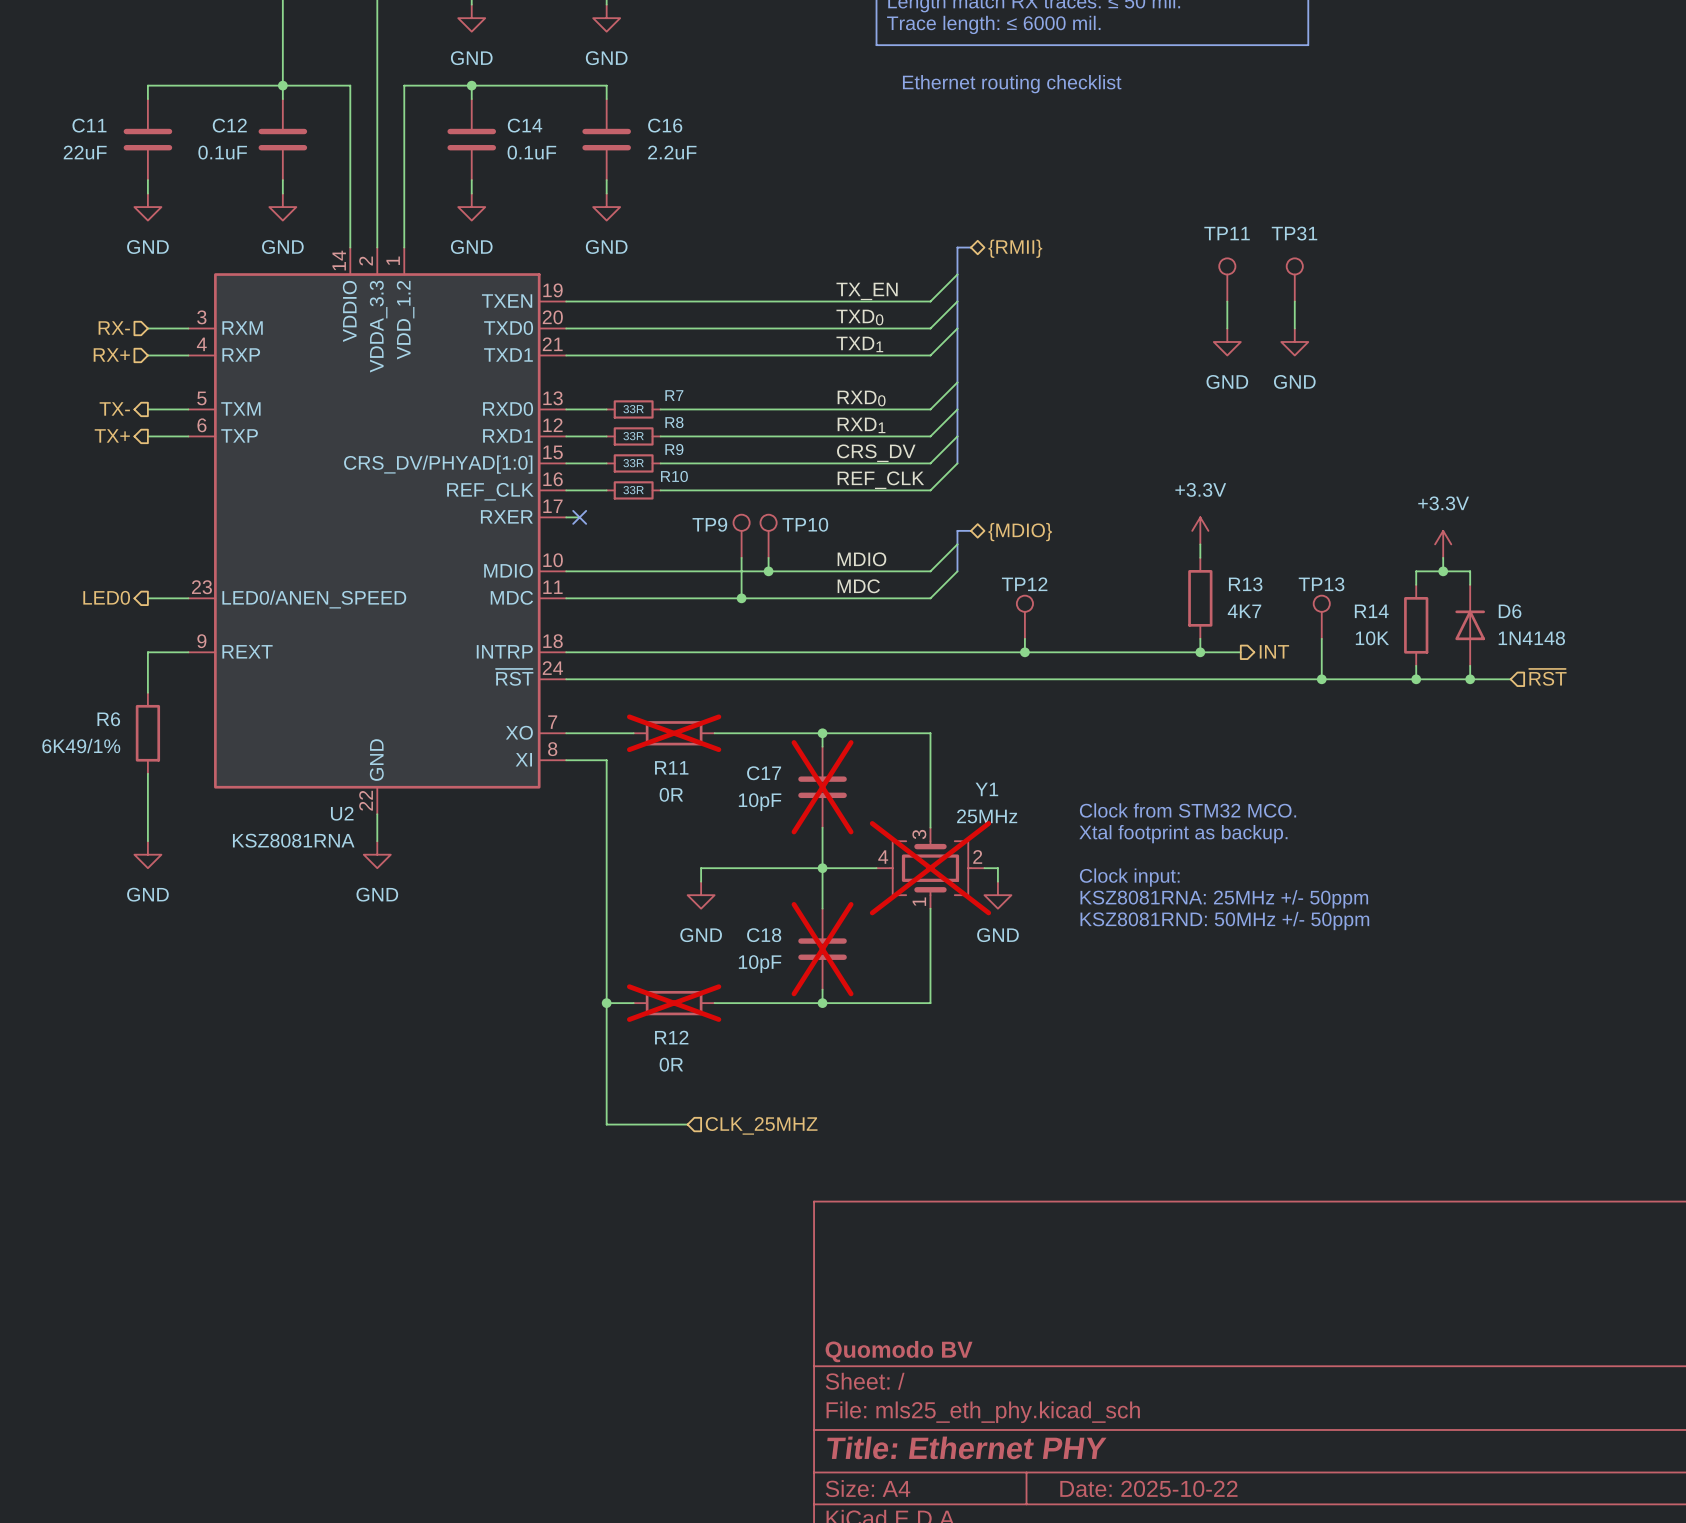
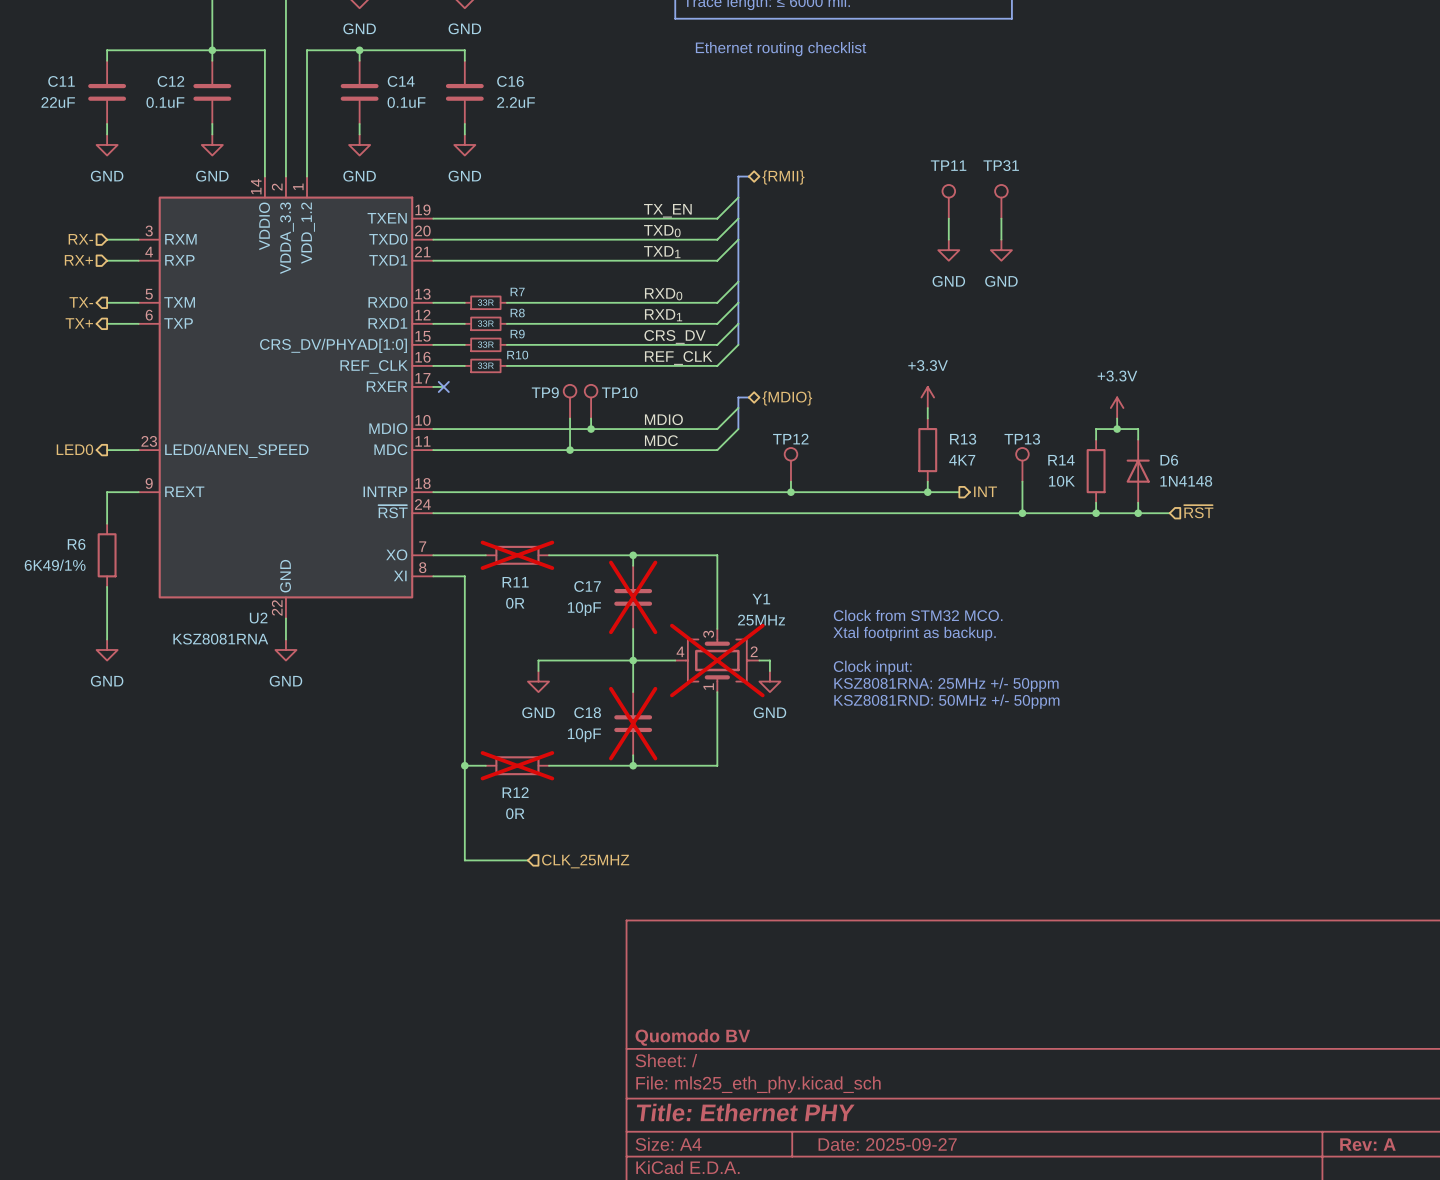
title block: Date: 2025-10-22 (1148, 1488) -> Date: 2025-09-27 (887, 1144)

